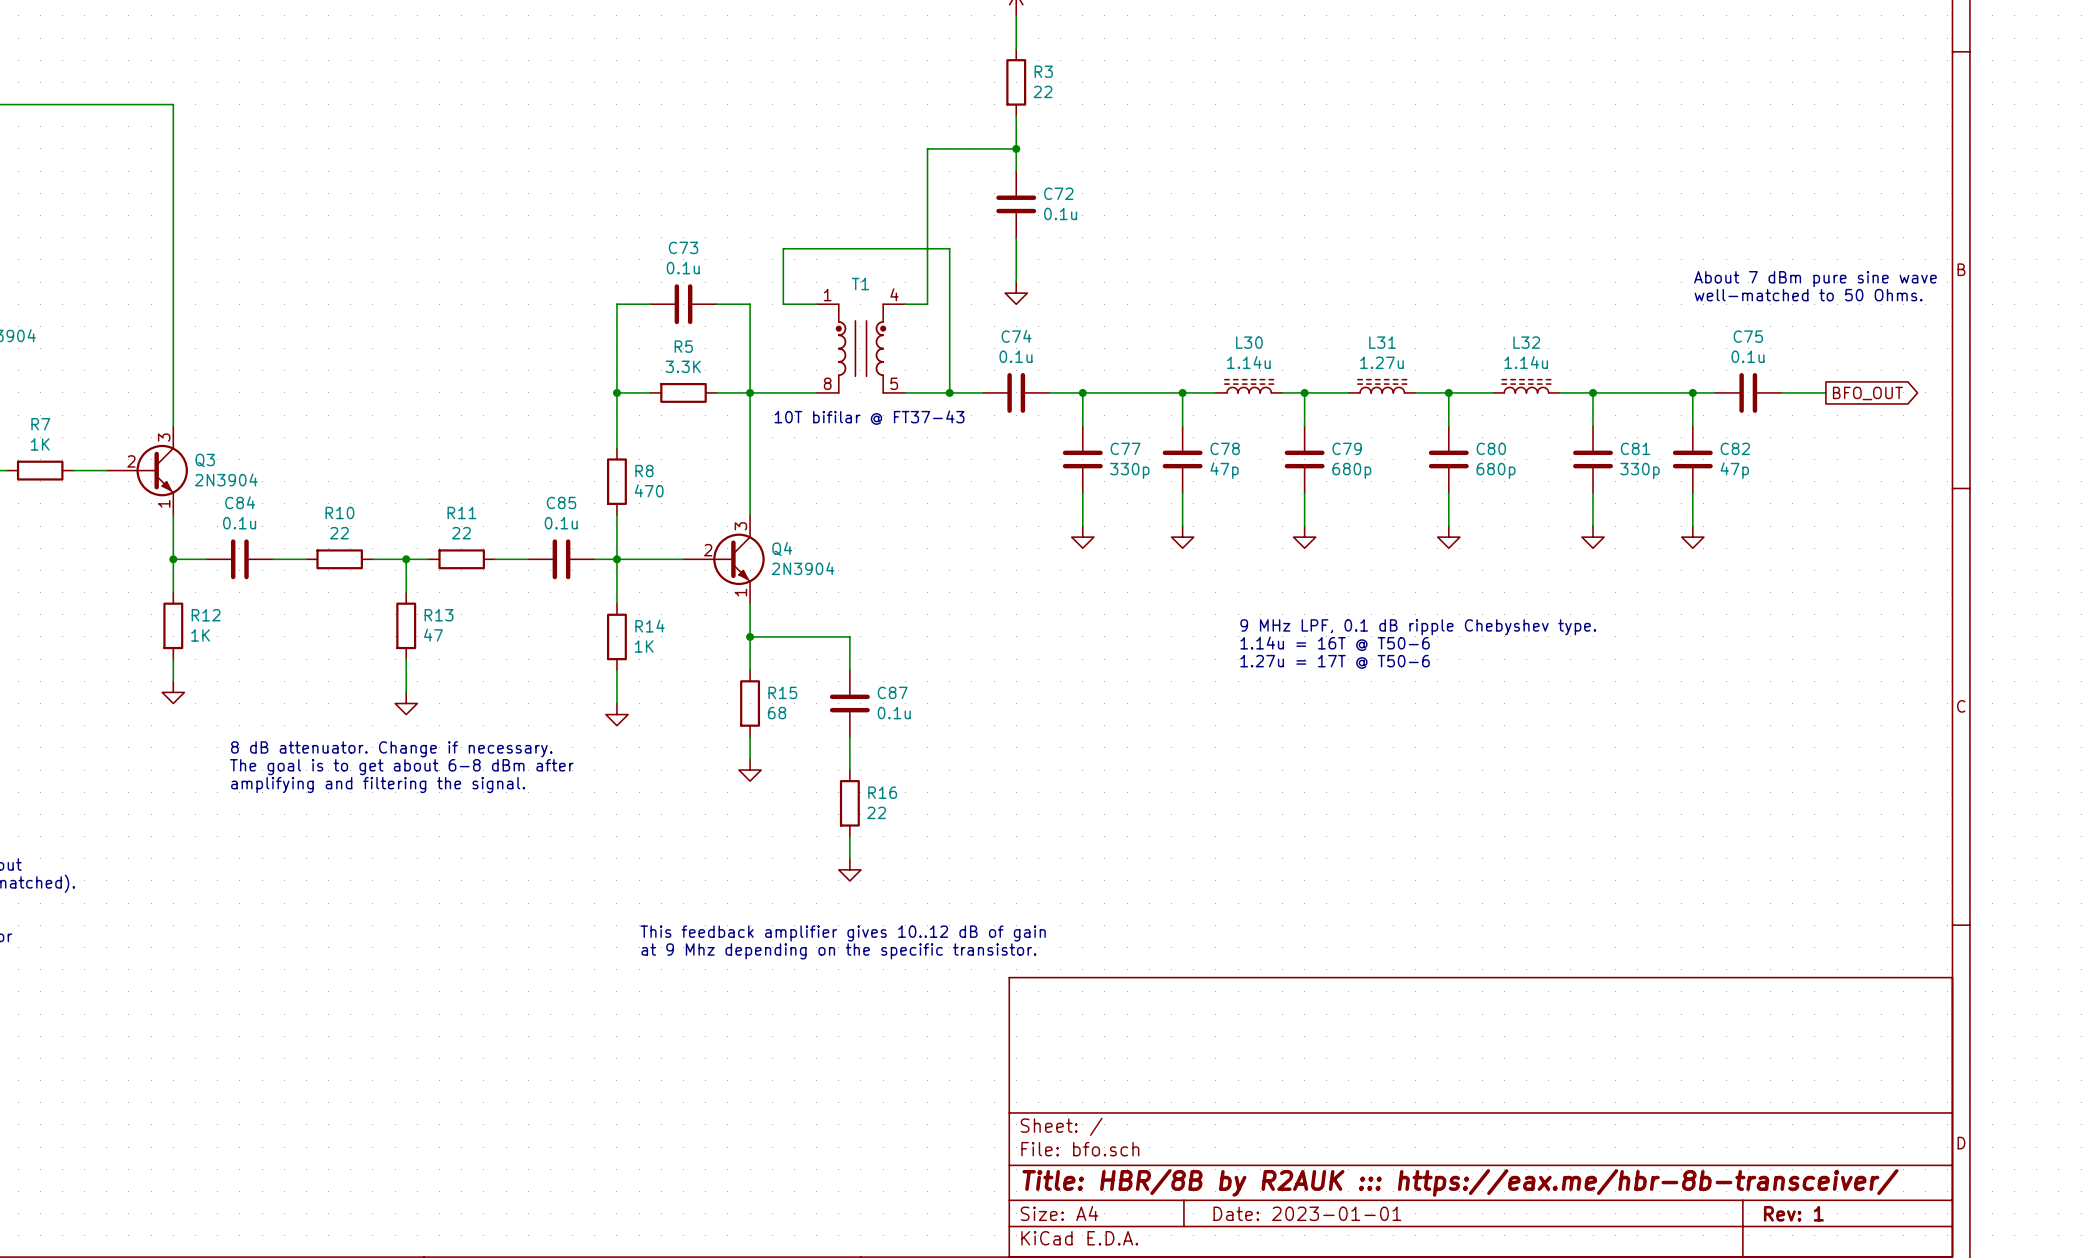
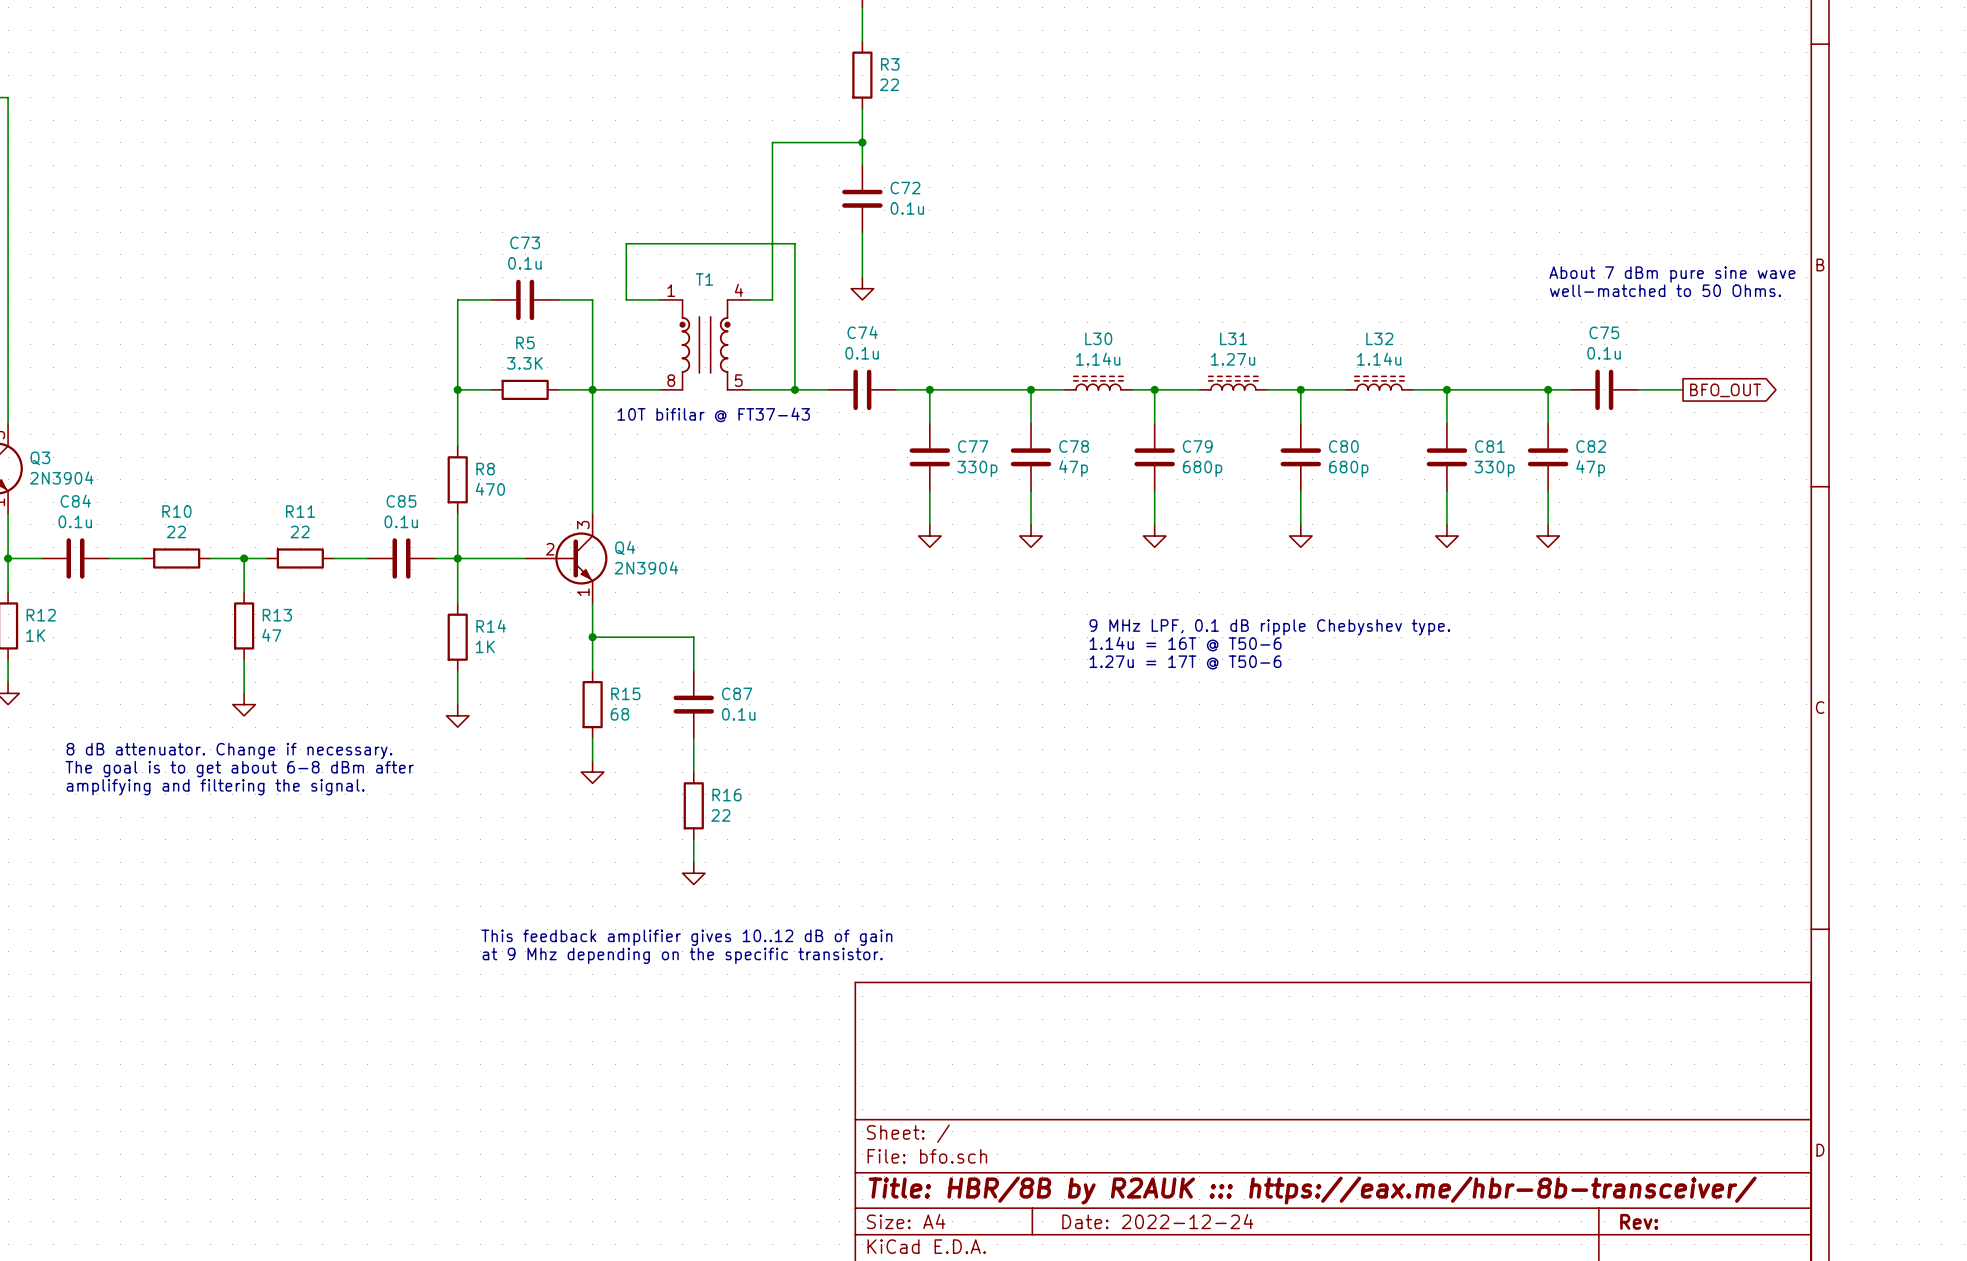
title block: Date: 2023-01-01 (1307, 1213) -> Date: 2022-12-24 (1157, 1221)
title block: Rev: 1 (1793, 1213) -> Rev: (1639, 1221)

